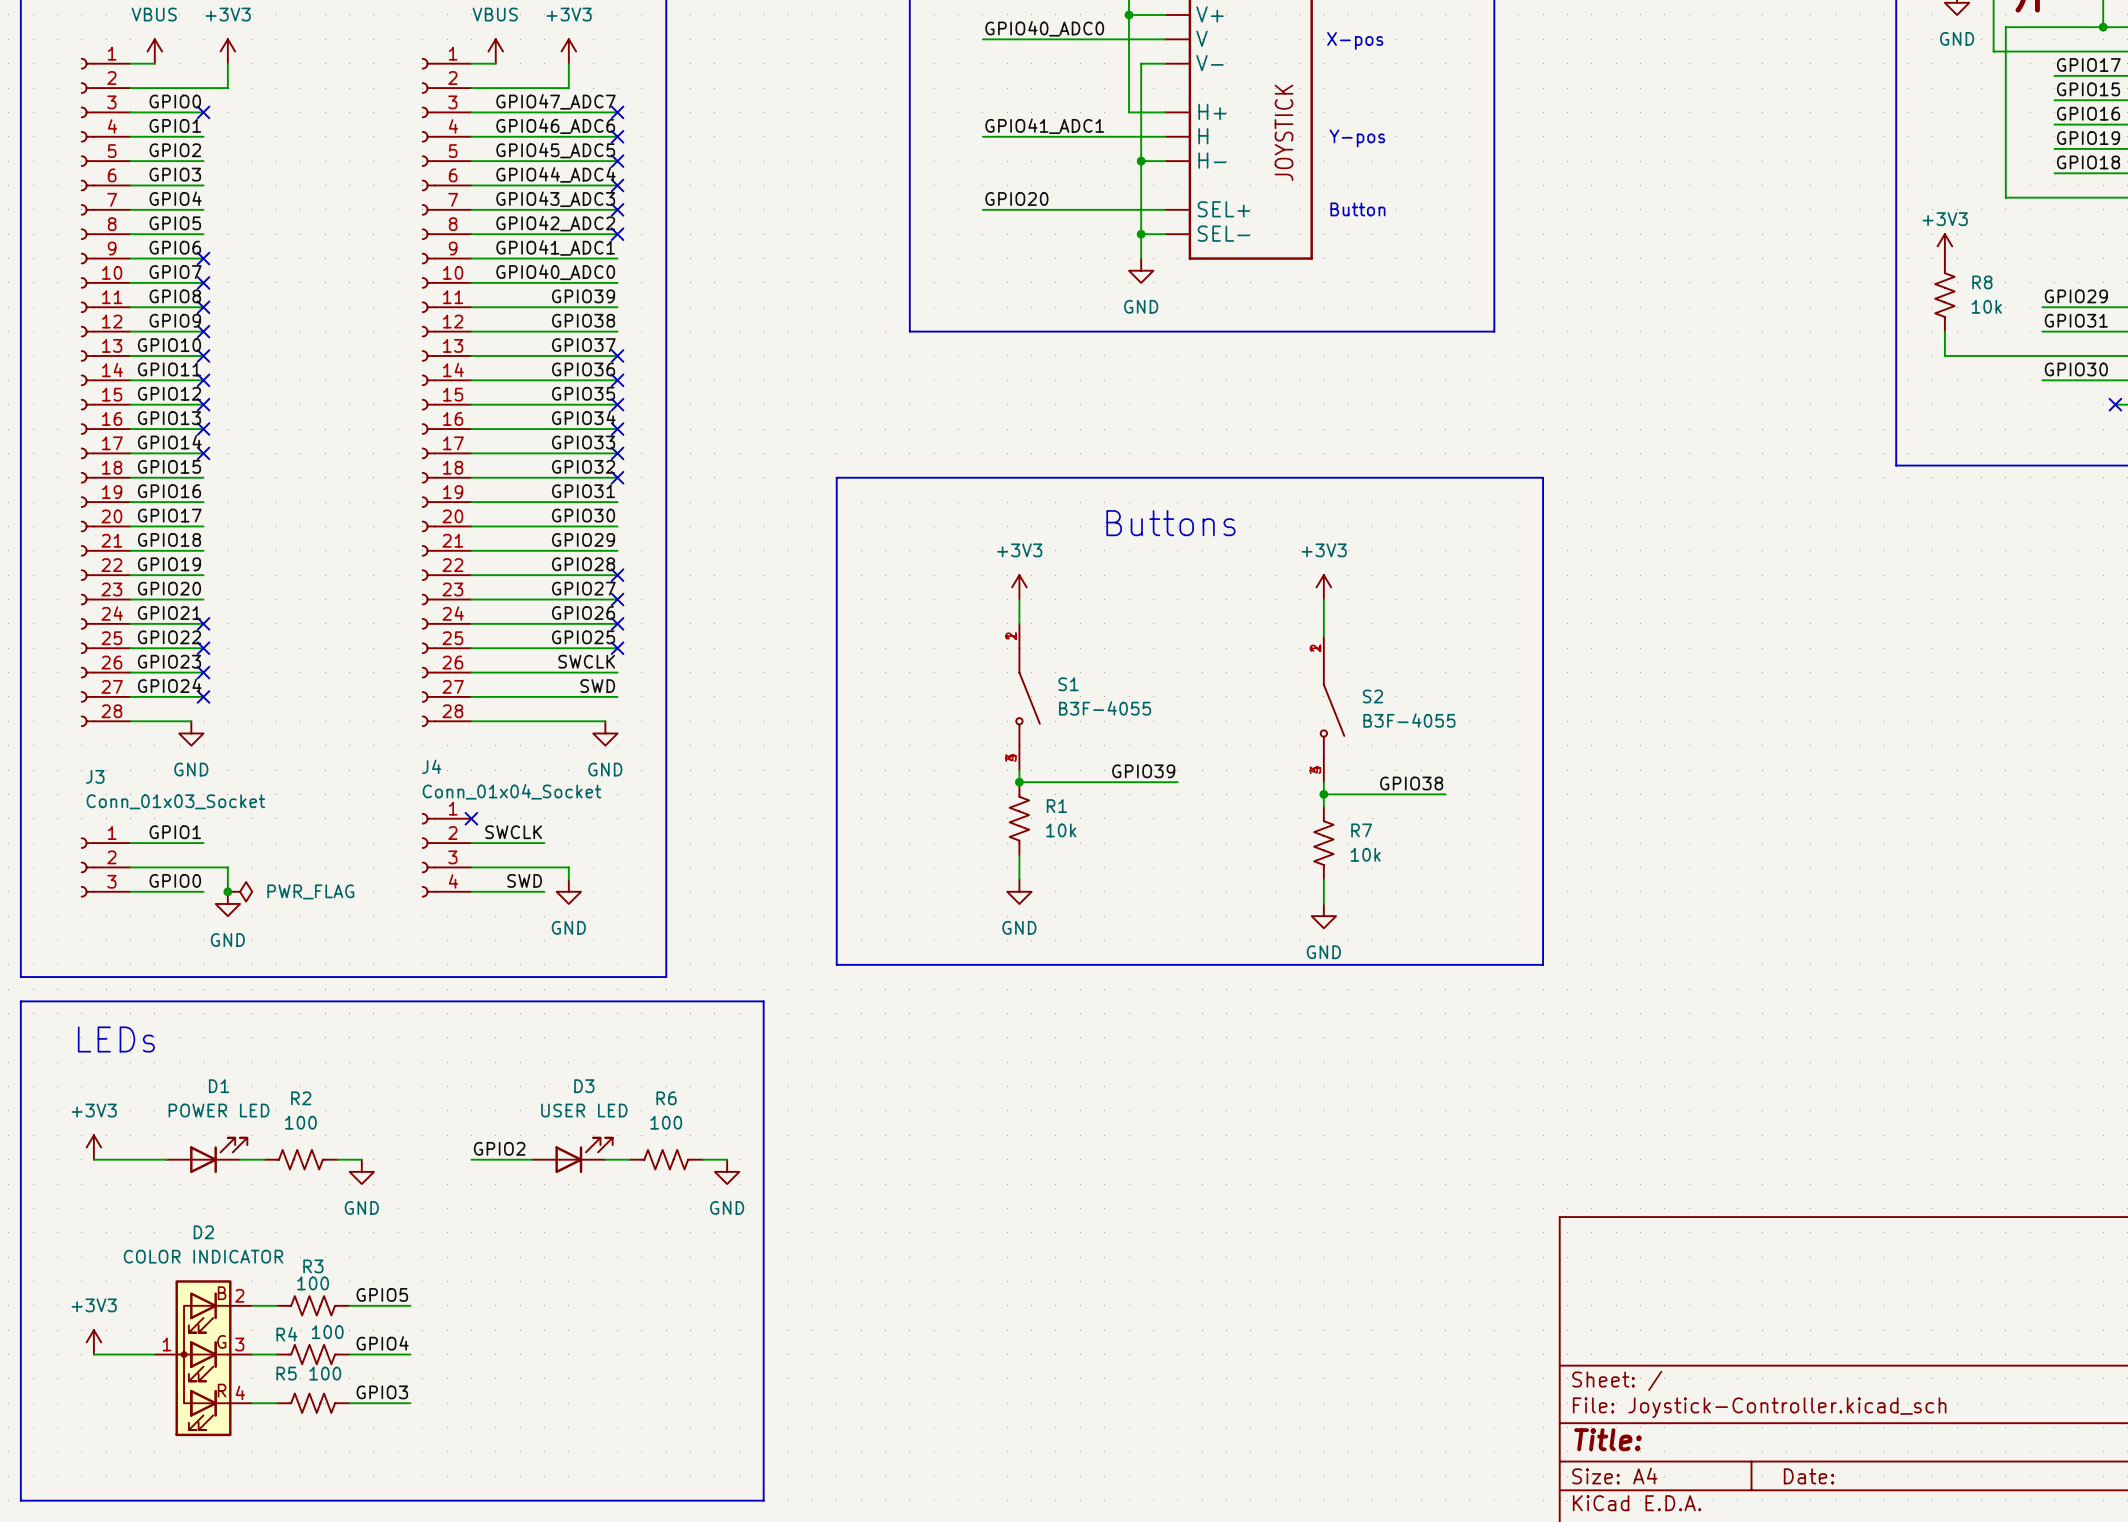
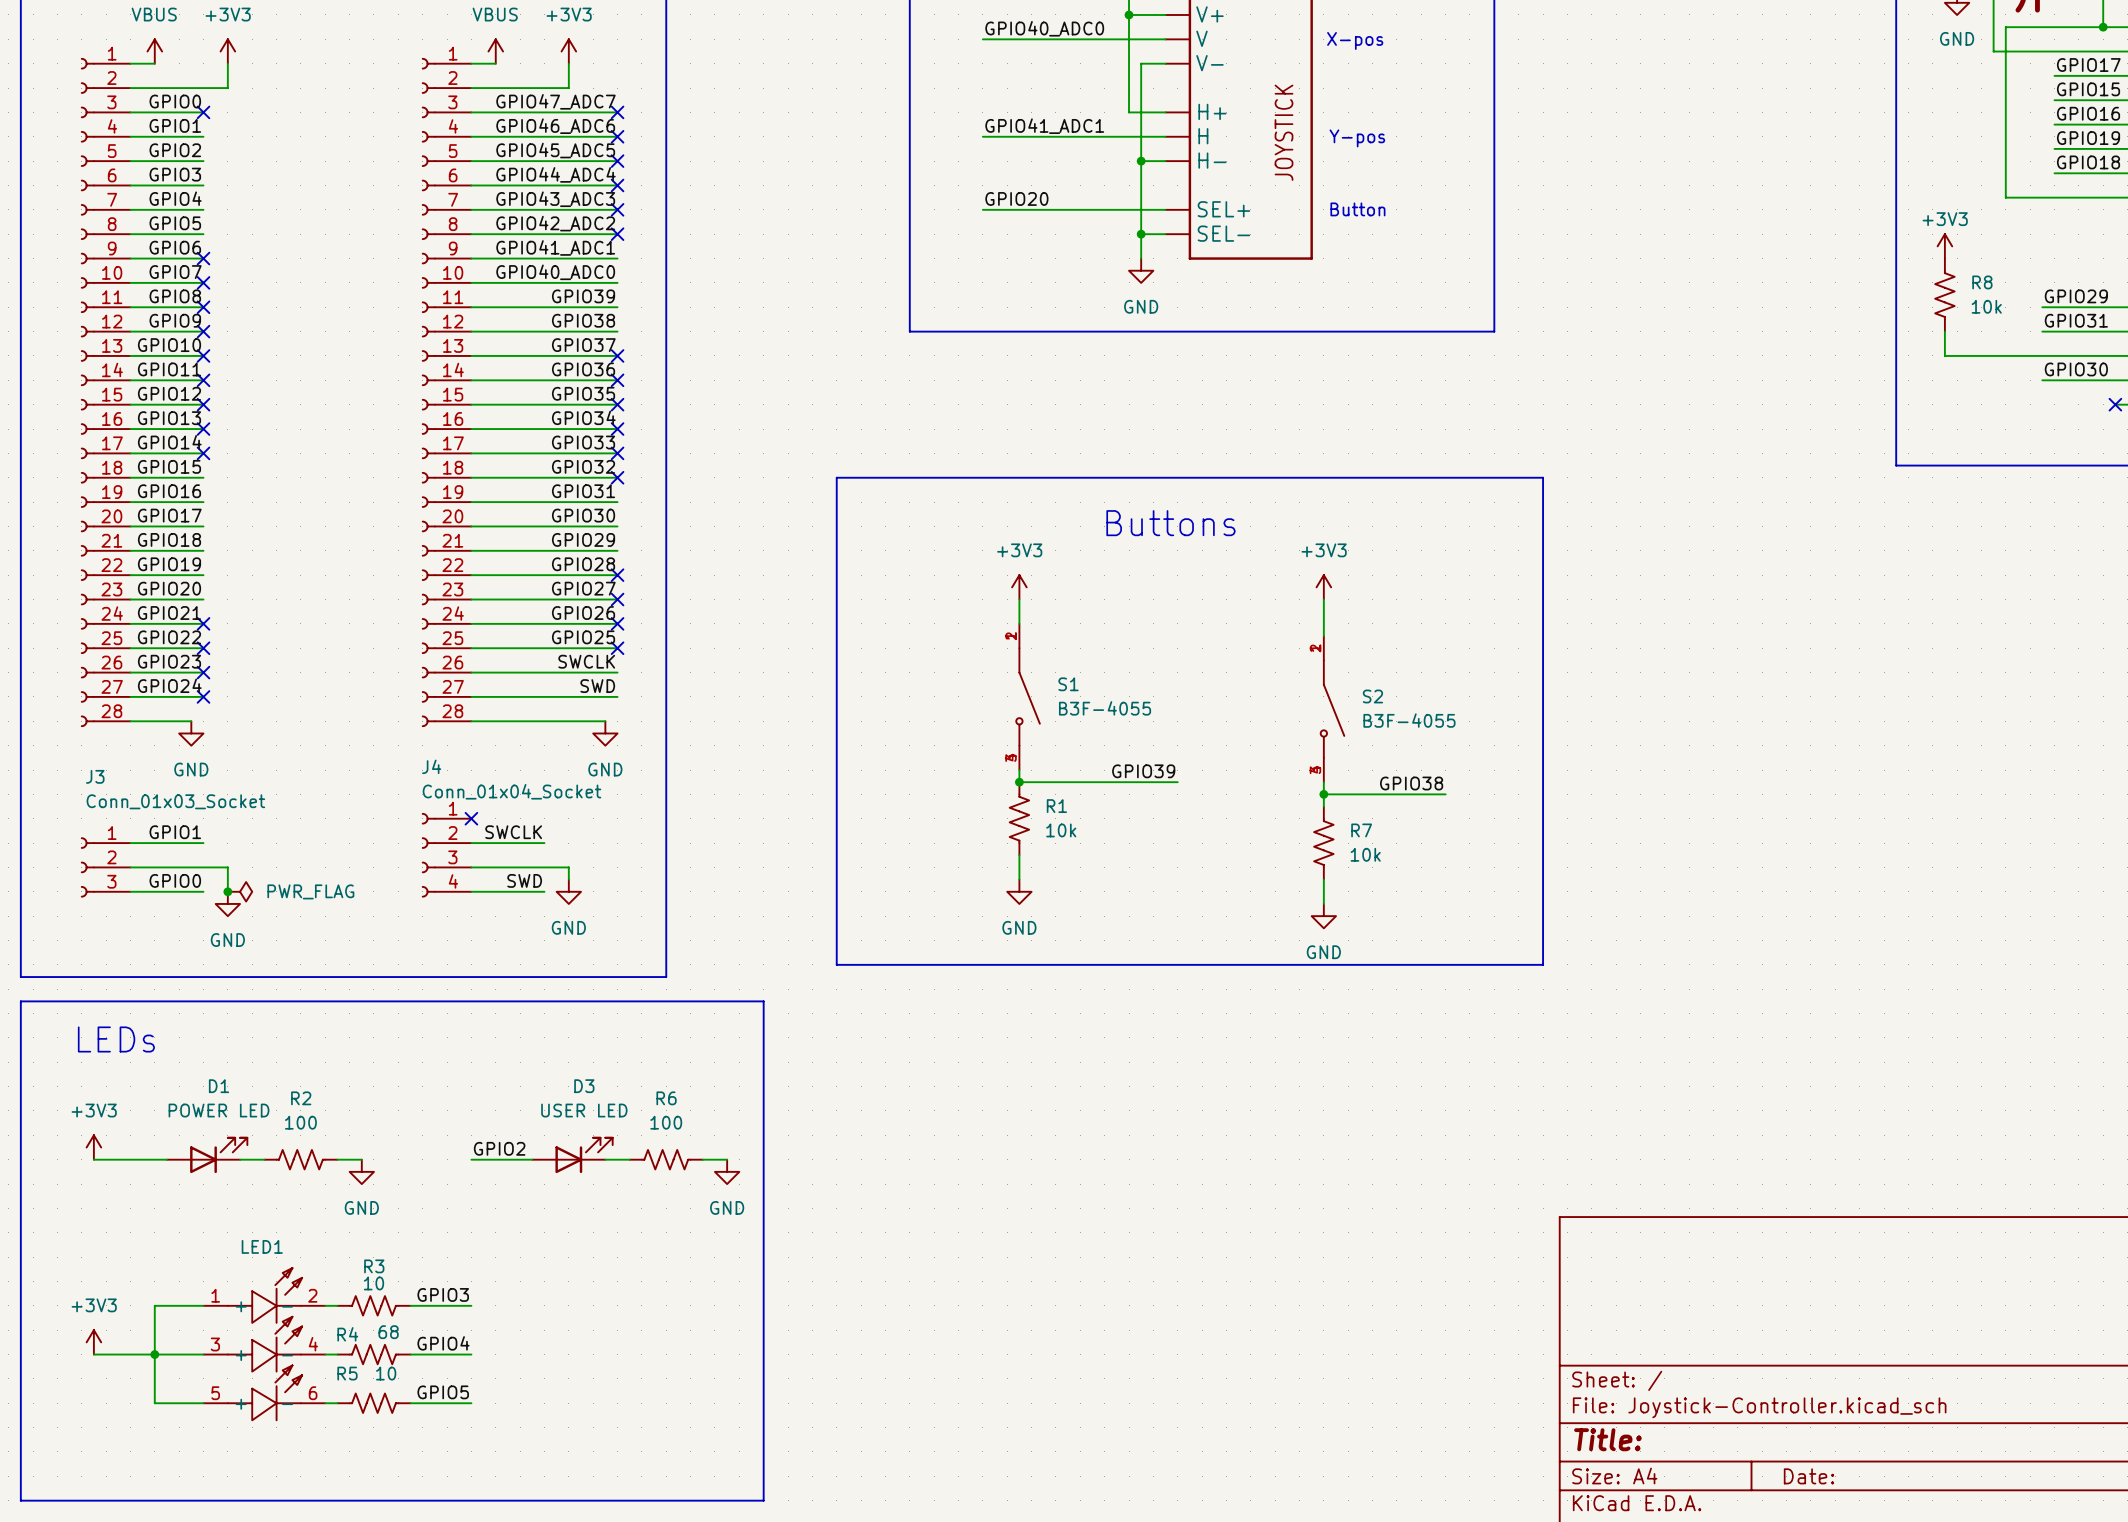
R3 value: 100 (313, 1283) -> 10 (373, 1283)
label position: GPIO5 (382, 1294) -> GPIO5 (443, 1392)
wire: none -> (203, 1305) (154, 1305) (154, 1403) (203, 1403)
wire: (252, 1305) (276, 1305) -> none
R3 position: (313, 1305) -> (373, 1305)
wire: none -> (325, 1305) (337, 1305)
wire: (349, 1305) (410, 1305) -> (471, 1305) (410, 1305)
R4 value: 100 (327, 1332) -> 68 (388, 1332)
label position: GPIO4 (382, 1343) -> GPIO4 (443, 1343)
LED1: none -> (264, 1344)
junction: none -> (154, 1354)
wire: (252, 1354) (276, 1354) -> none
R4 position: (313, 1354) -> (373, 1354)
wire: none -> (325, 1354) (337, 1354)
wire: (349, 1354) (410, 1354) -> (471, 1354) (410, 1354)
D2: COLOR INDICATOR (203, 1358) -> none
R5 value: 100 (325, 1373) -> 10 (386, 1373)
label position: GPIO3 (382, 1392) -> GPIO3 (443, 1294)
wire: (252, 1403) (276, 1403) -> none
R5 position: (313, 1403) -> (373, 1403)
wire: none -> (325, 1403) (337, 1403)
wire: (349, 1403) (410, 1403) -> (471, 1403) (410, 1403)

